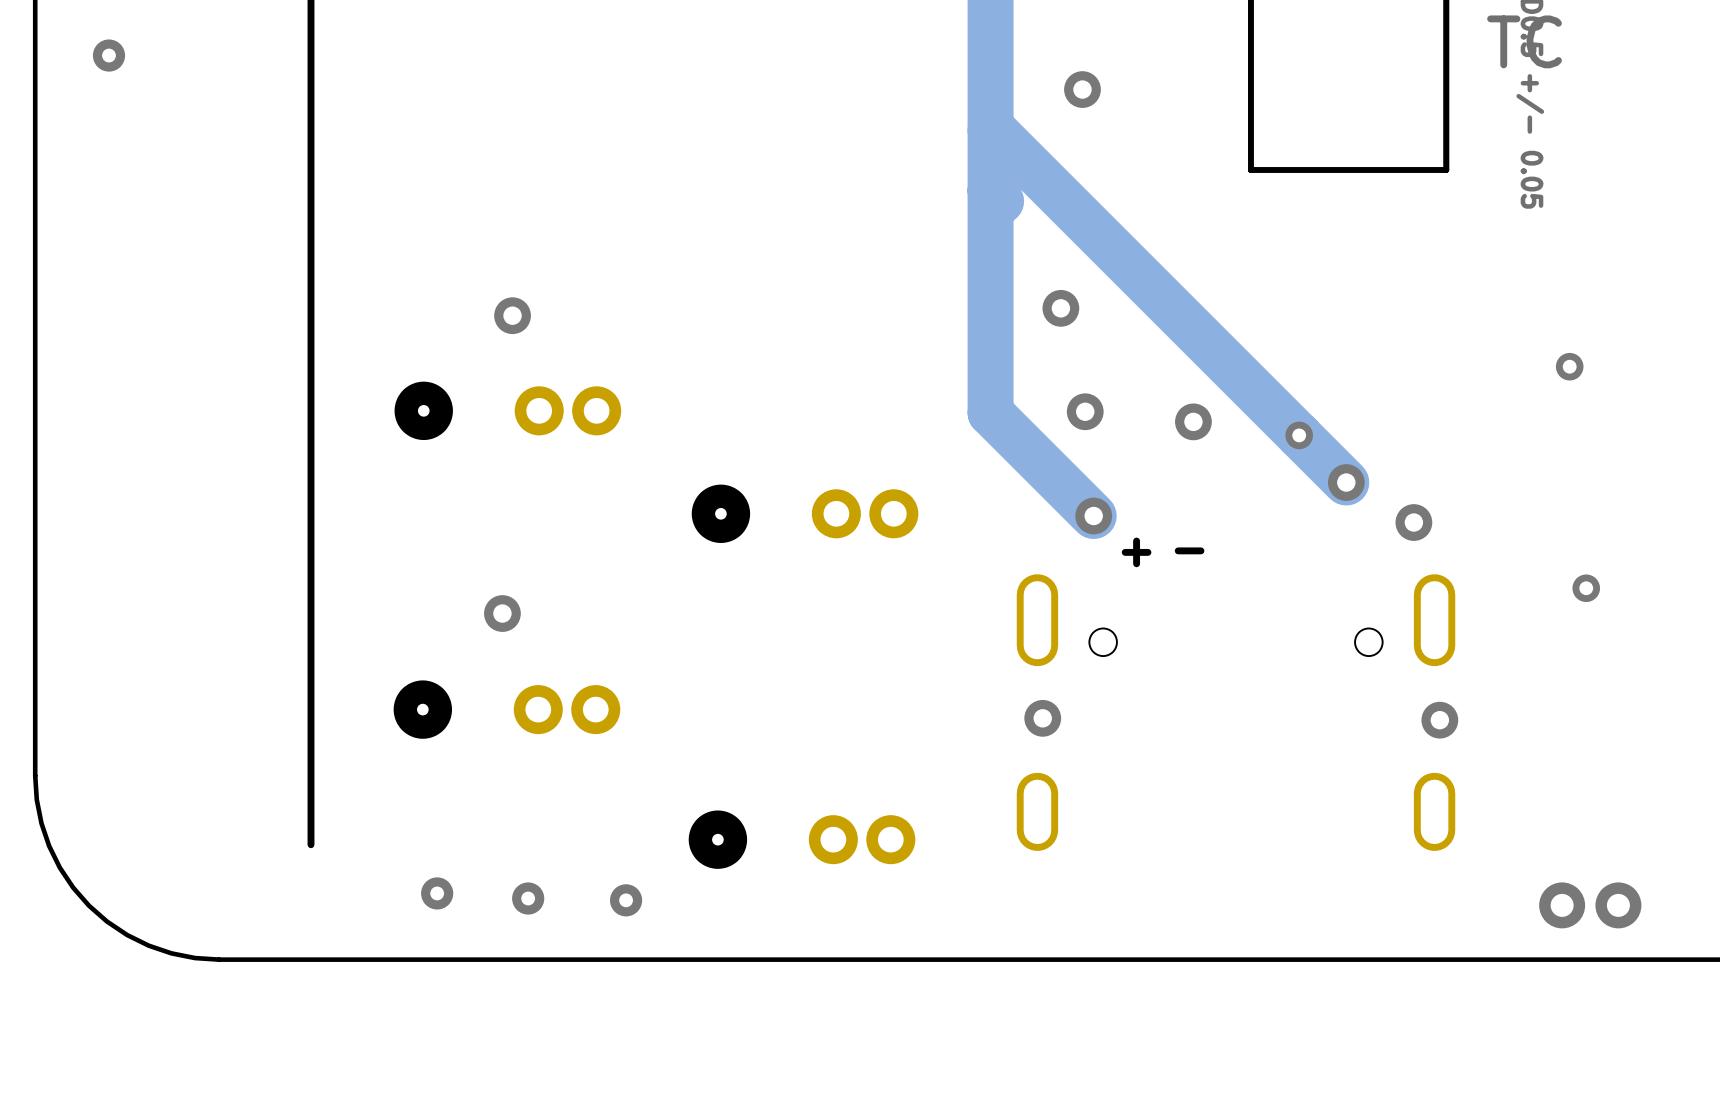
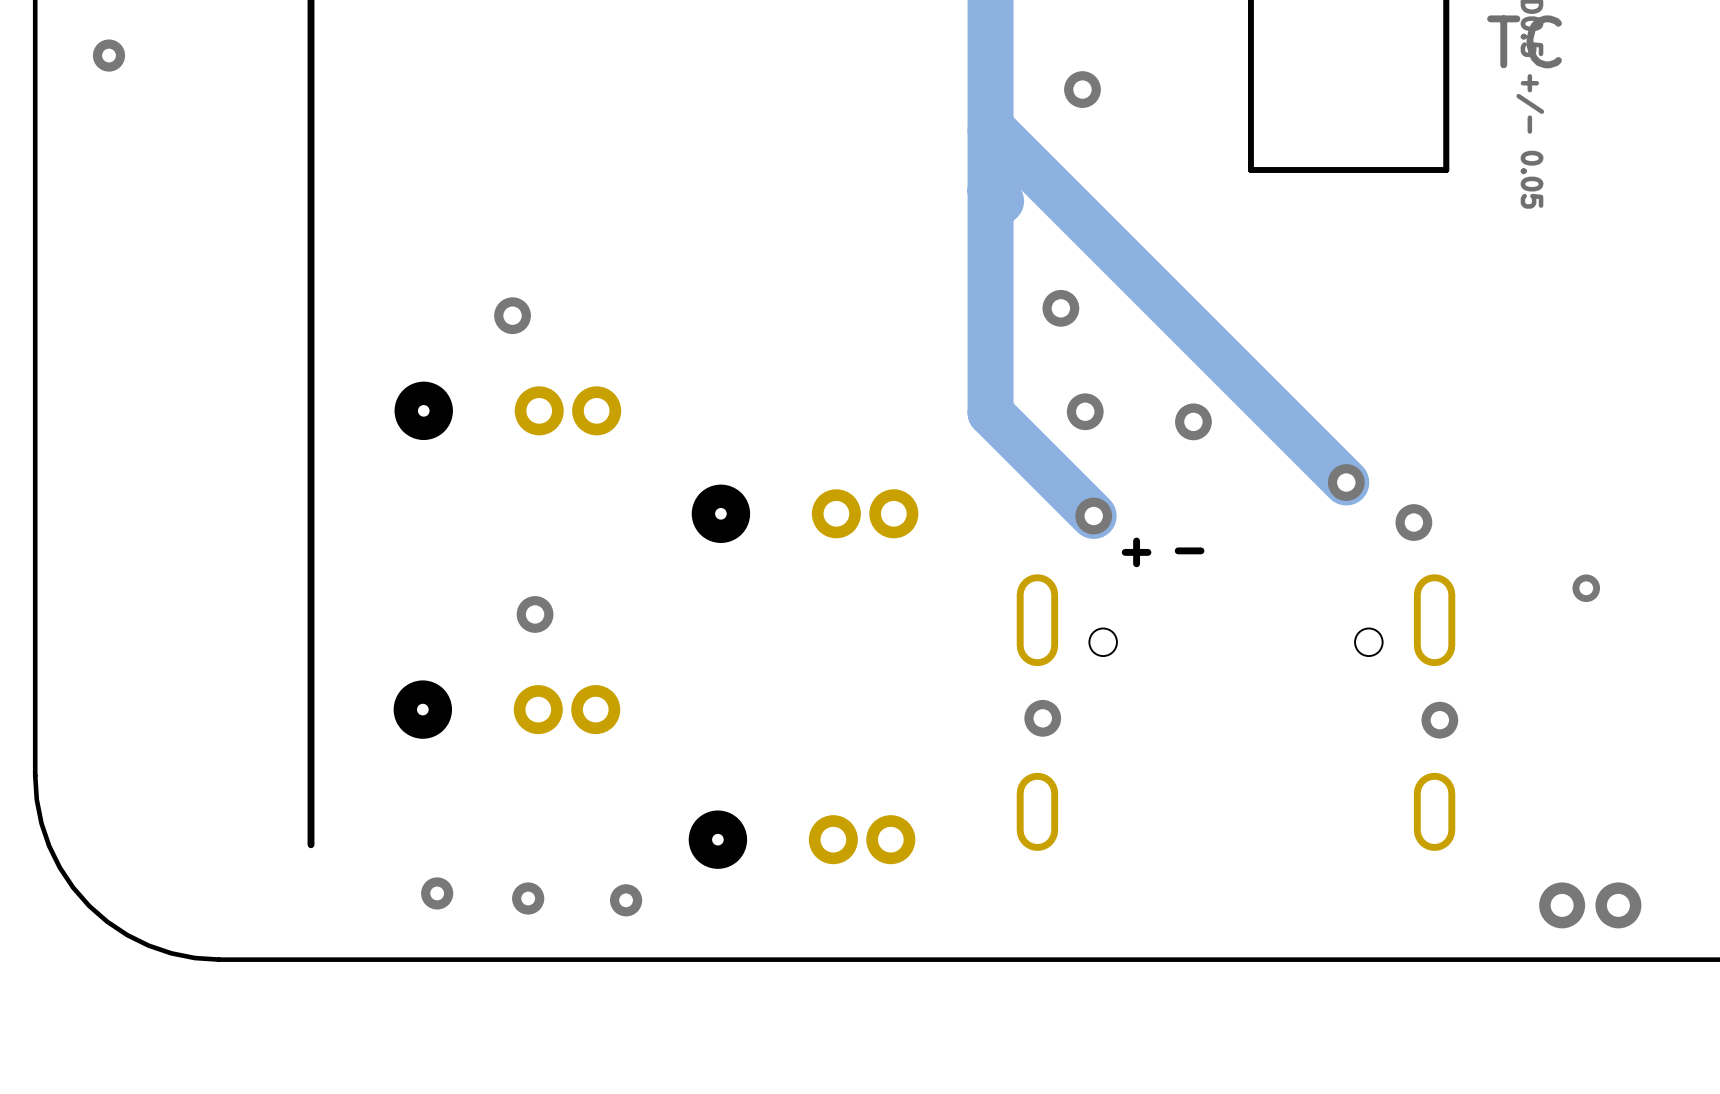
via: (1569, 366) -> none
via: (1299, 435) -> none
via position: (502, 613) -> (535, 614)

